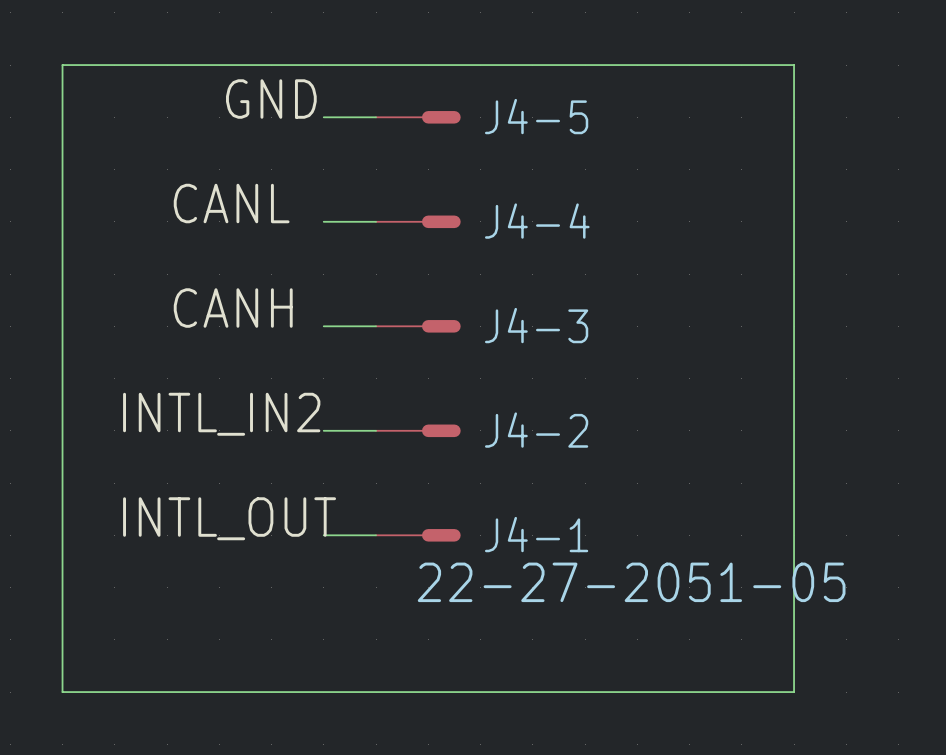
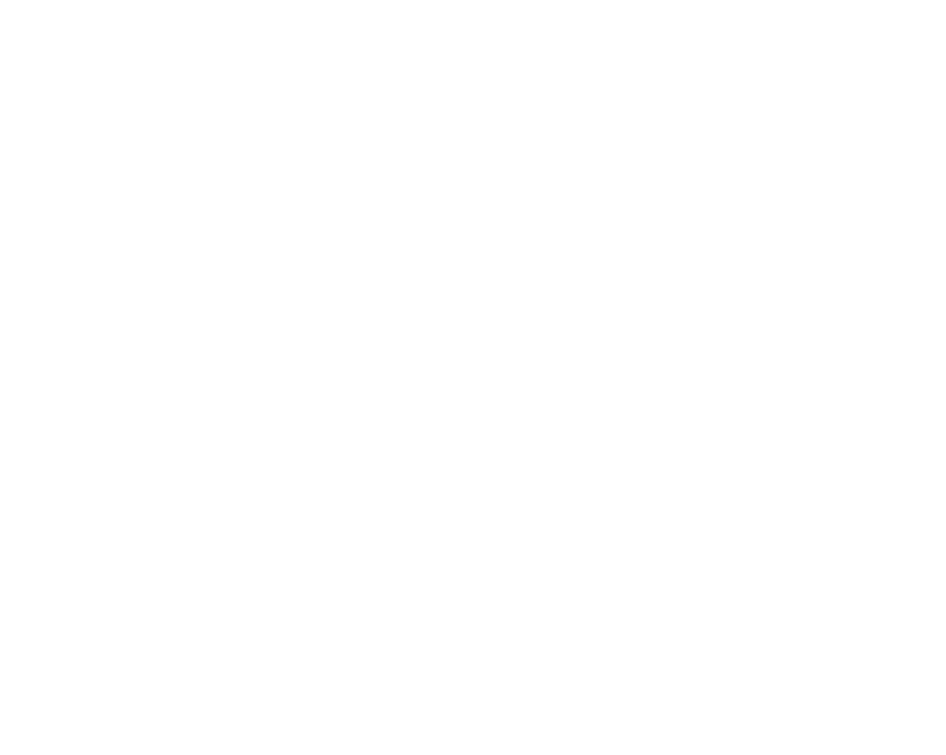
wire: (62, 65) (62, 692) (794, 692) (794, 65) (62, 65) -> none
label: GND (271, 99) -> none
wire: (323, 117) (376, 117) -> none
J4-5: (418, 117) -> none
label: CANL (231, 203) -> none
wire: (323, 221) (376, 221) -> none
J4-4: (418, 221) -> none
label: CANH (233, 308) -> none
wire: (323, 326) (376, 326) -> none
J4-3: (418, 326) -> none
label: INTL_IN2 (221, 414) -> none
wire: (323, 430) (376, 430) -> none
J4-2: (418, 430) -> none
label: INTL_OUT (229, 518) -> none
wire: (323, 535) (376, 535) -> none
J4-1: 22-27-2051-05 (418, 535) -> none

